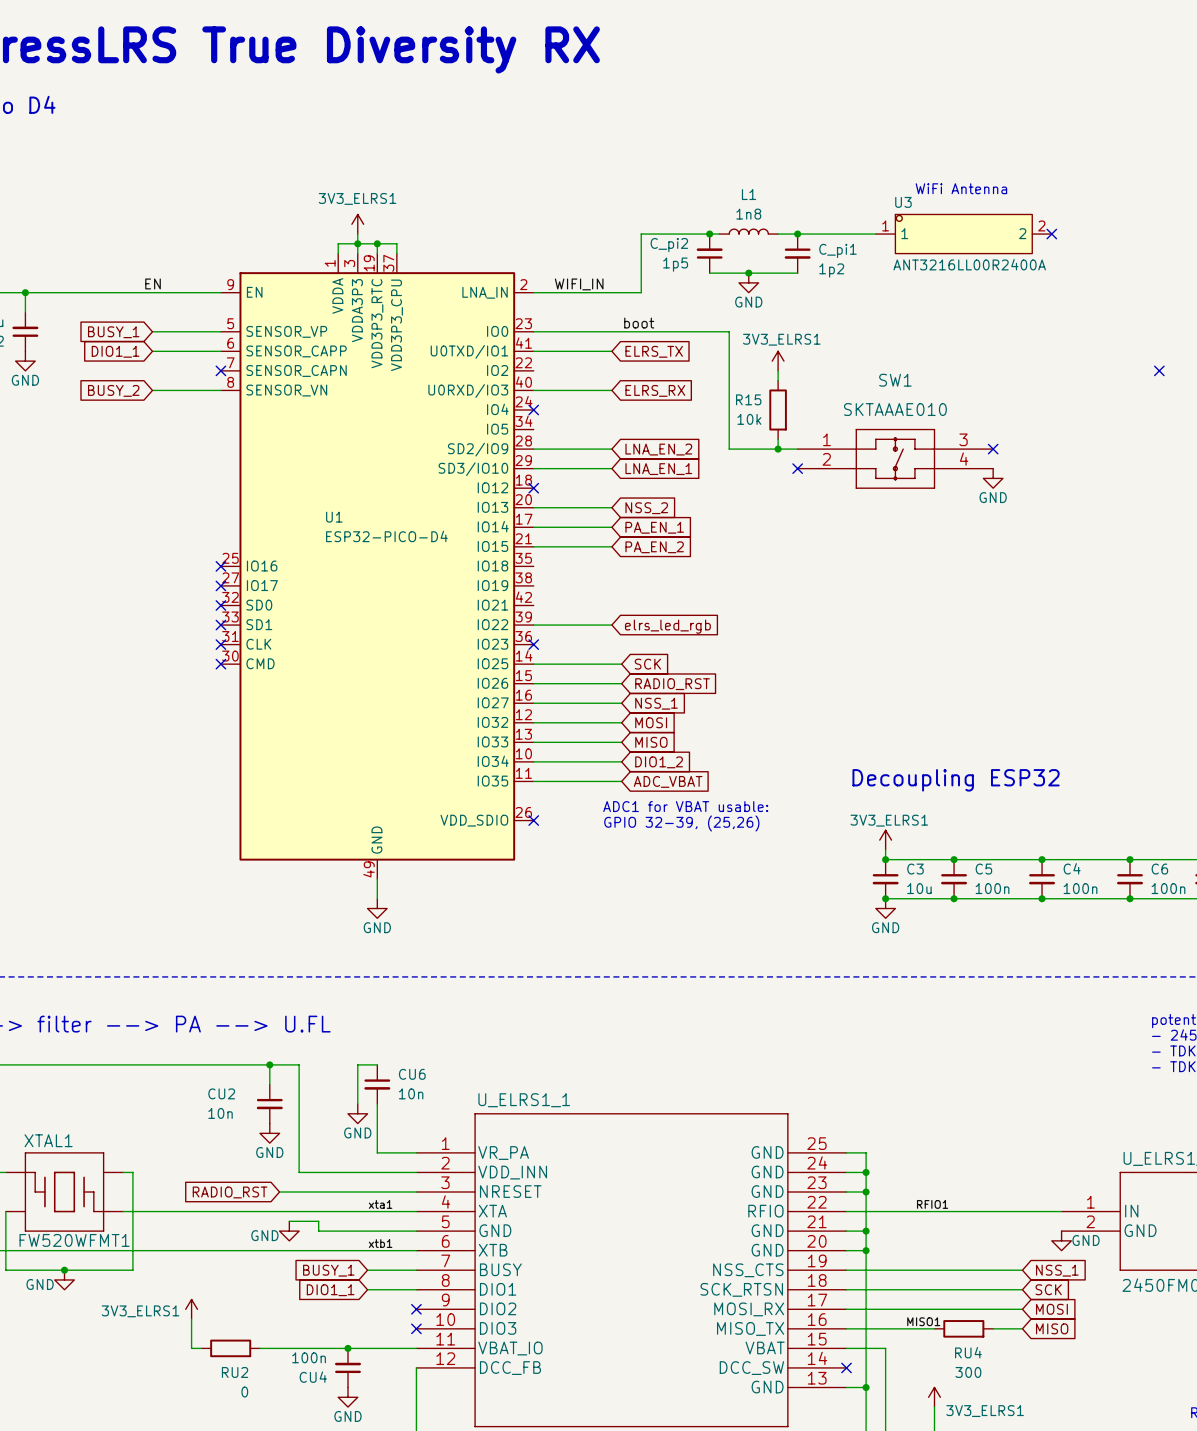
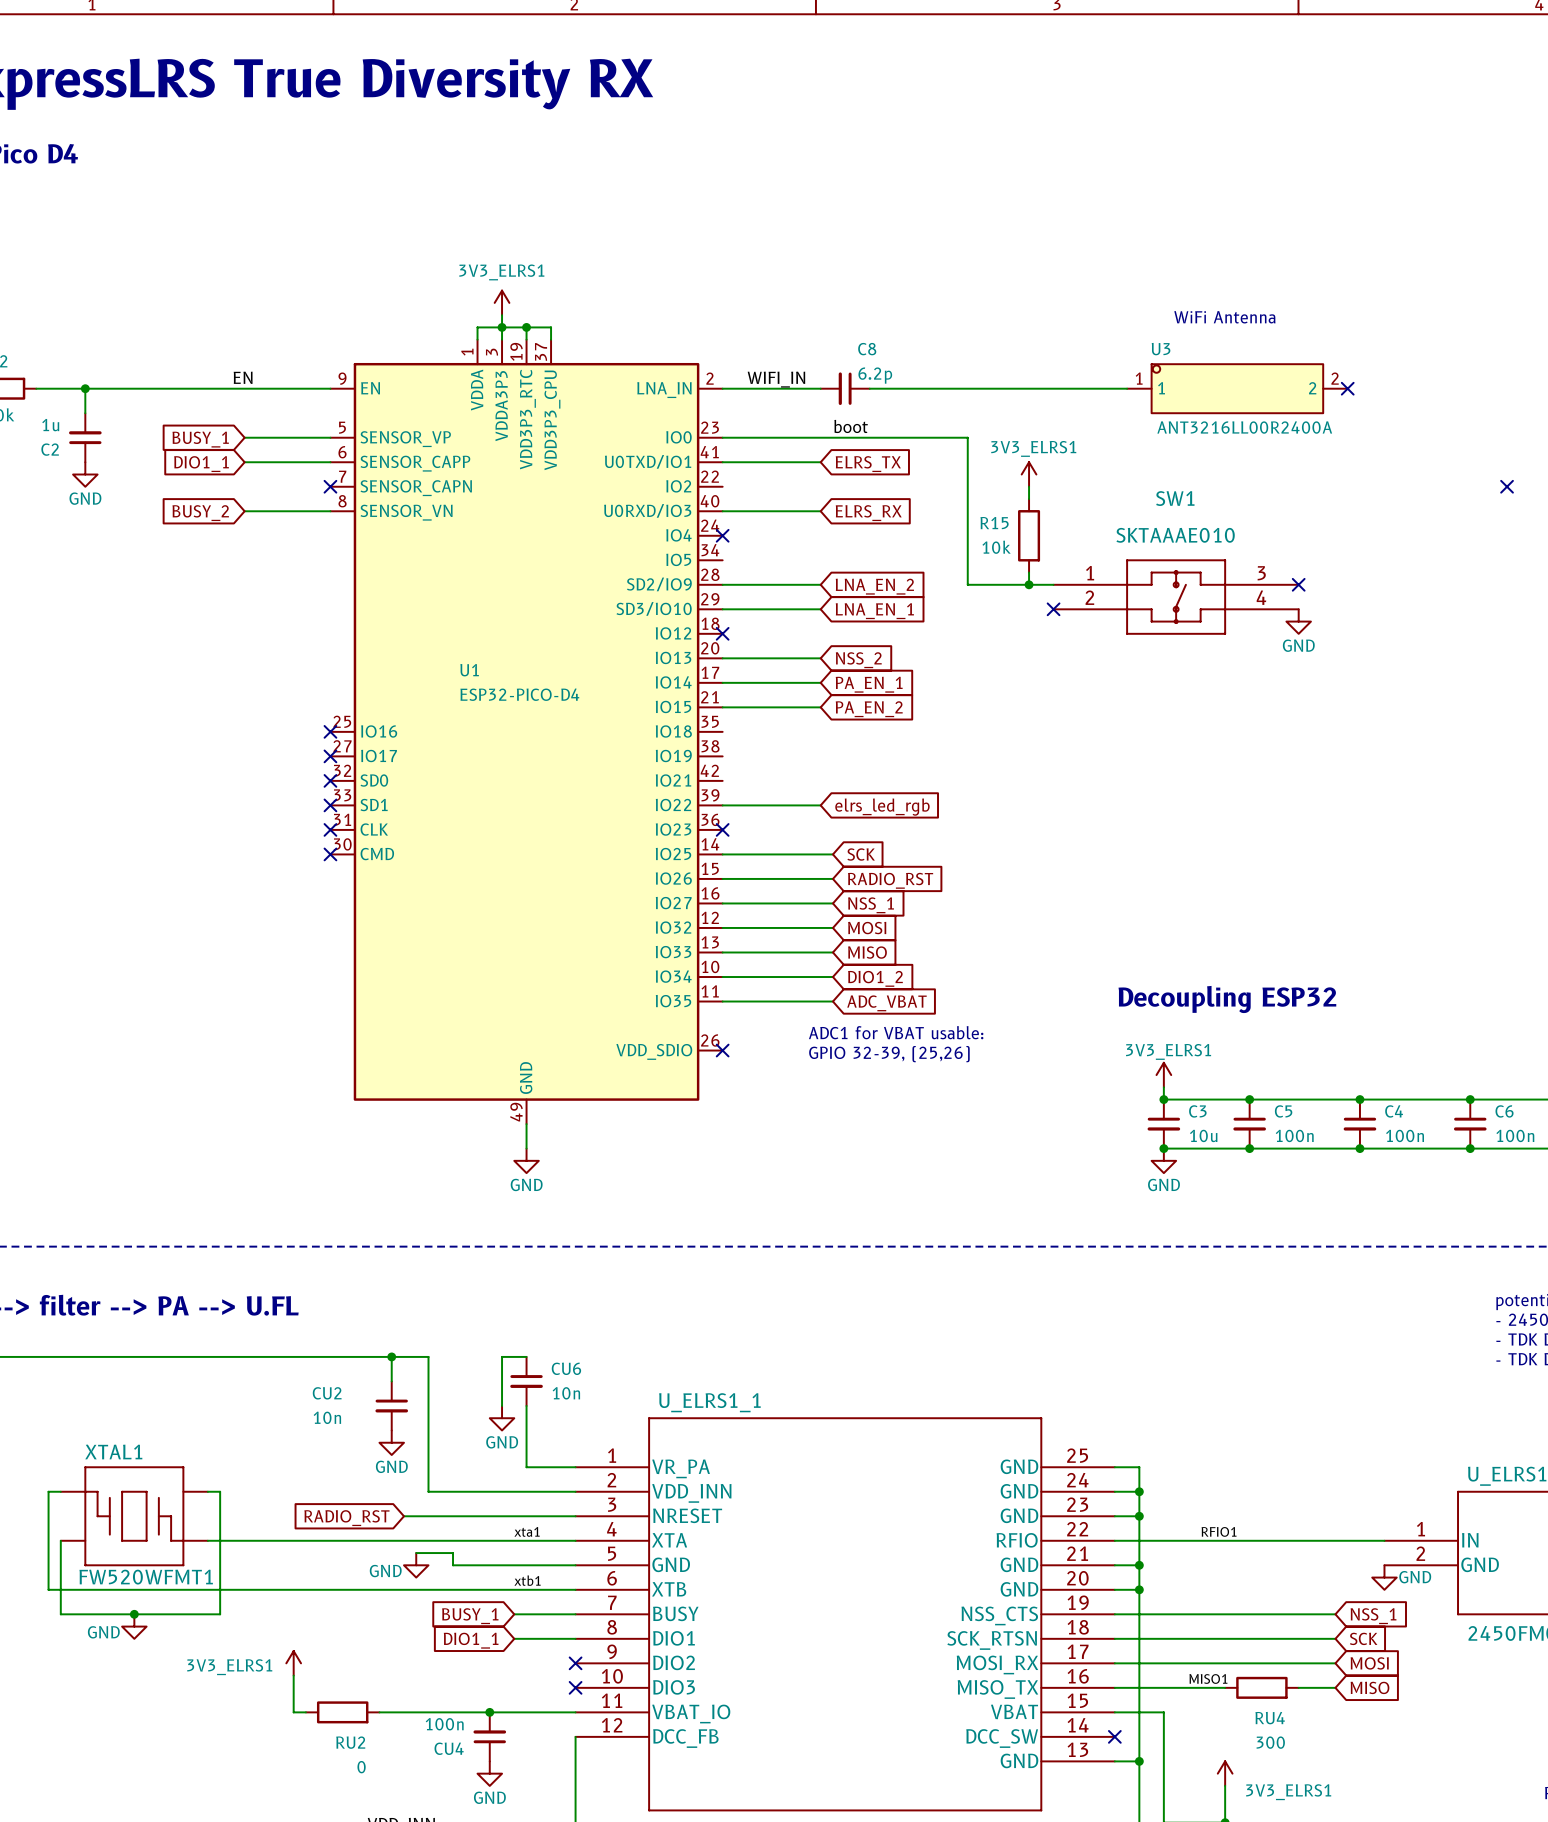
text position: WiFi Antenna (961, 188) -> WiFi Antenna (1224, 317)
L1: 1n8 (748, 231) -> none
junction: (709, 234) -> none
wire: (719, 234) (641, 234) (641, 292) (611, 292) -> none
wire: (778, 234) (875, 234) -> none
junction: (797, 234) -> none
U3 position: (963, 234) -> (1237, 388)
no-connect mark: (1051, 234) -> none
C_pi2: 1p5 (709, 253) -> none
C_pi1: 1p2 (797, 253) -> none
wire: (709, 273) (797, 273) -> none
junction: (748, 273) -> none
power symbol: GND (748, 282) -> none
C8: none -> 6.2p (845, 388)
wire: none -> (869, 388) (1127, 388)
no-connect mark: none -> (1347, 388)

